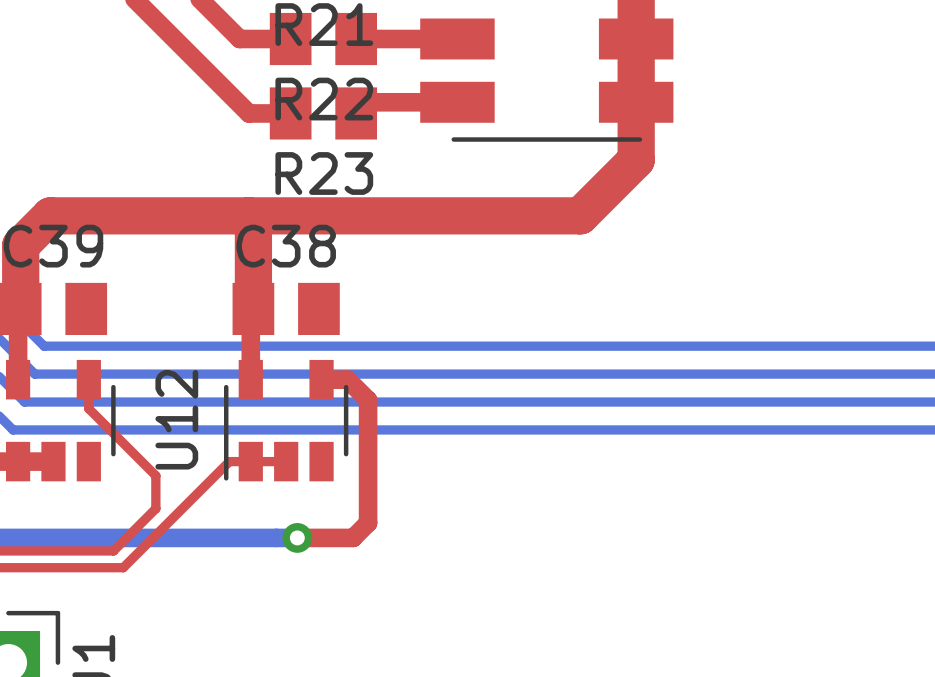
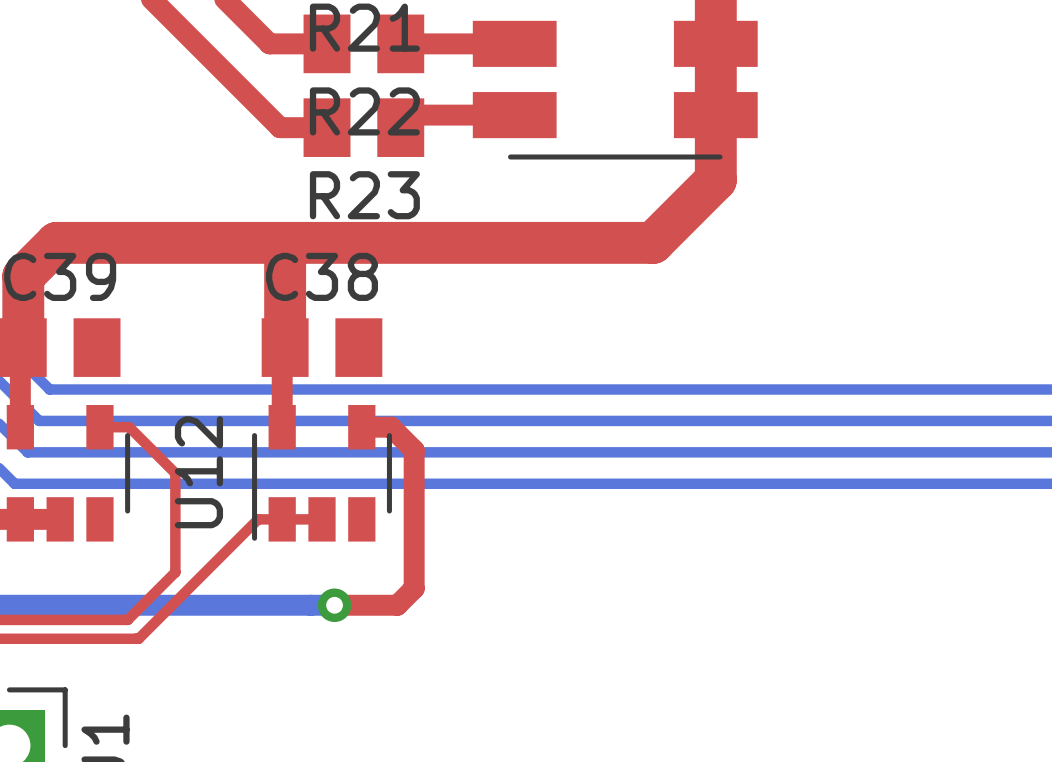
top track: (88, 379) (88, 408) (155, 475) -> (99, 427) (129, 427) (175, 473) (175, 535)

